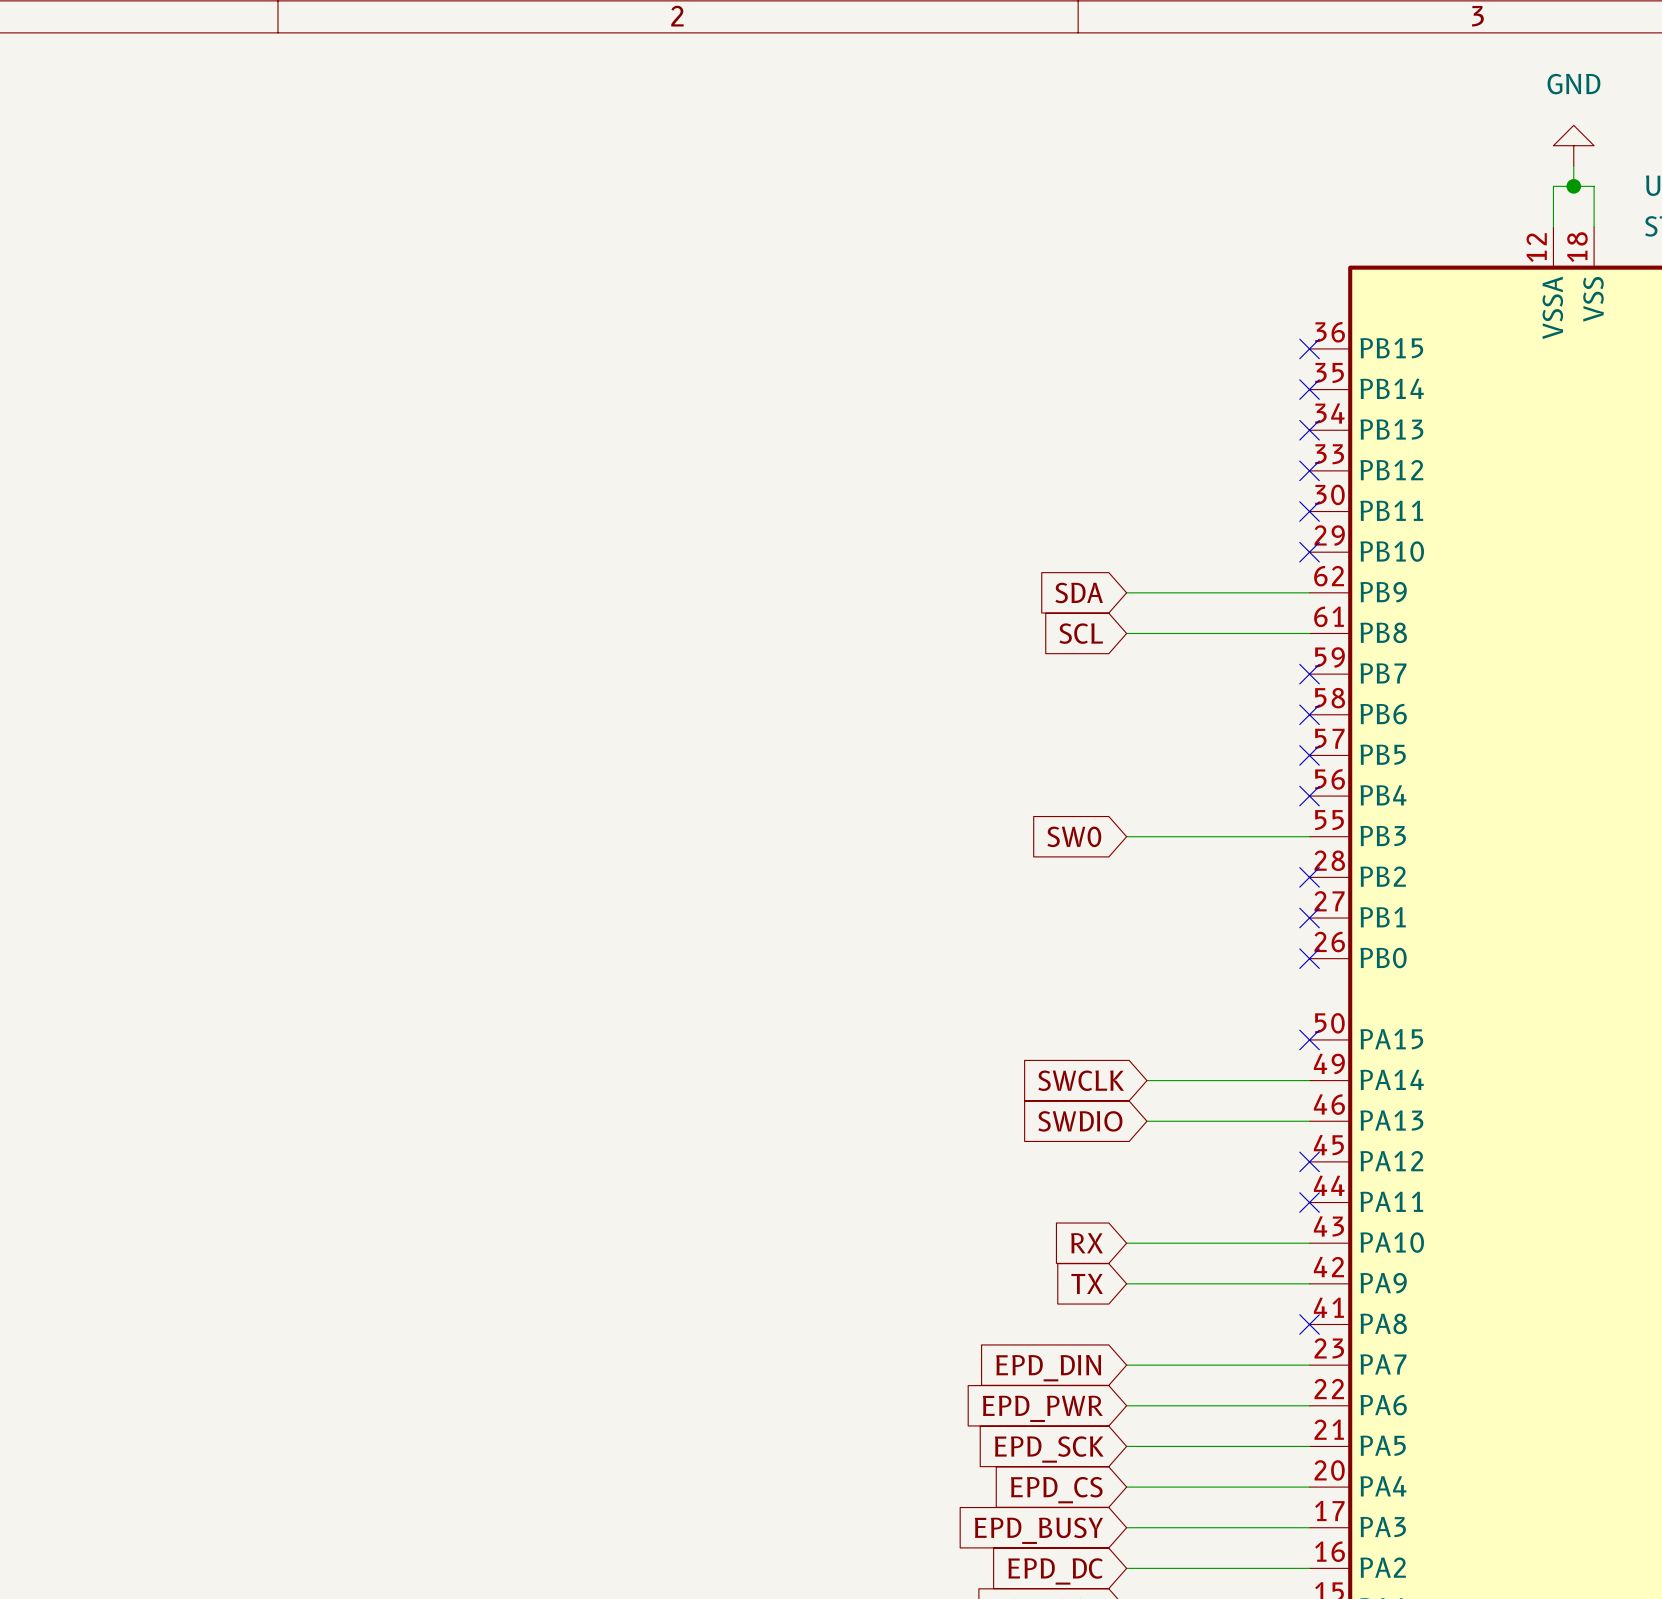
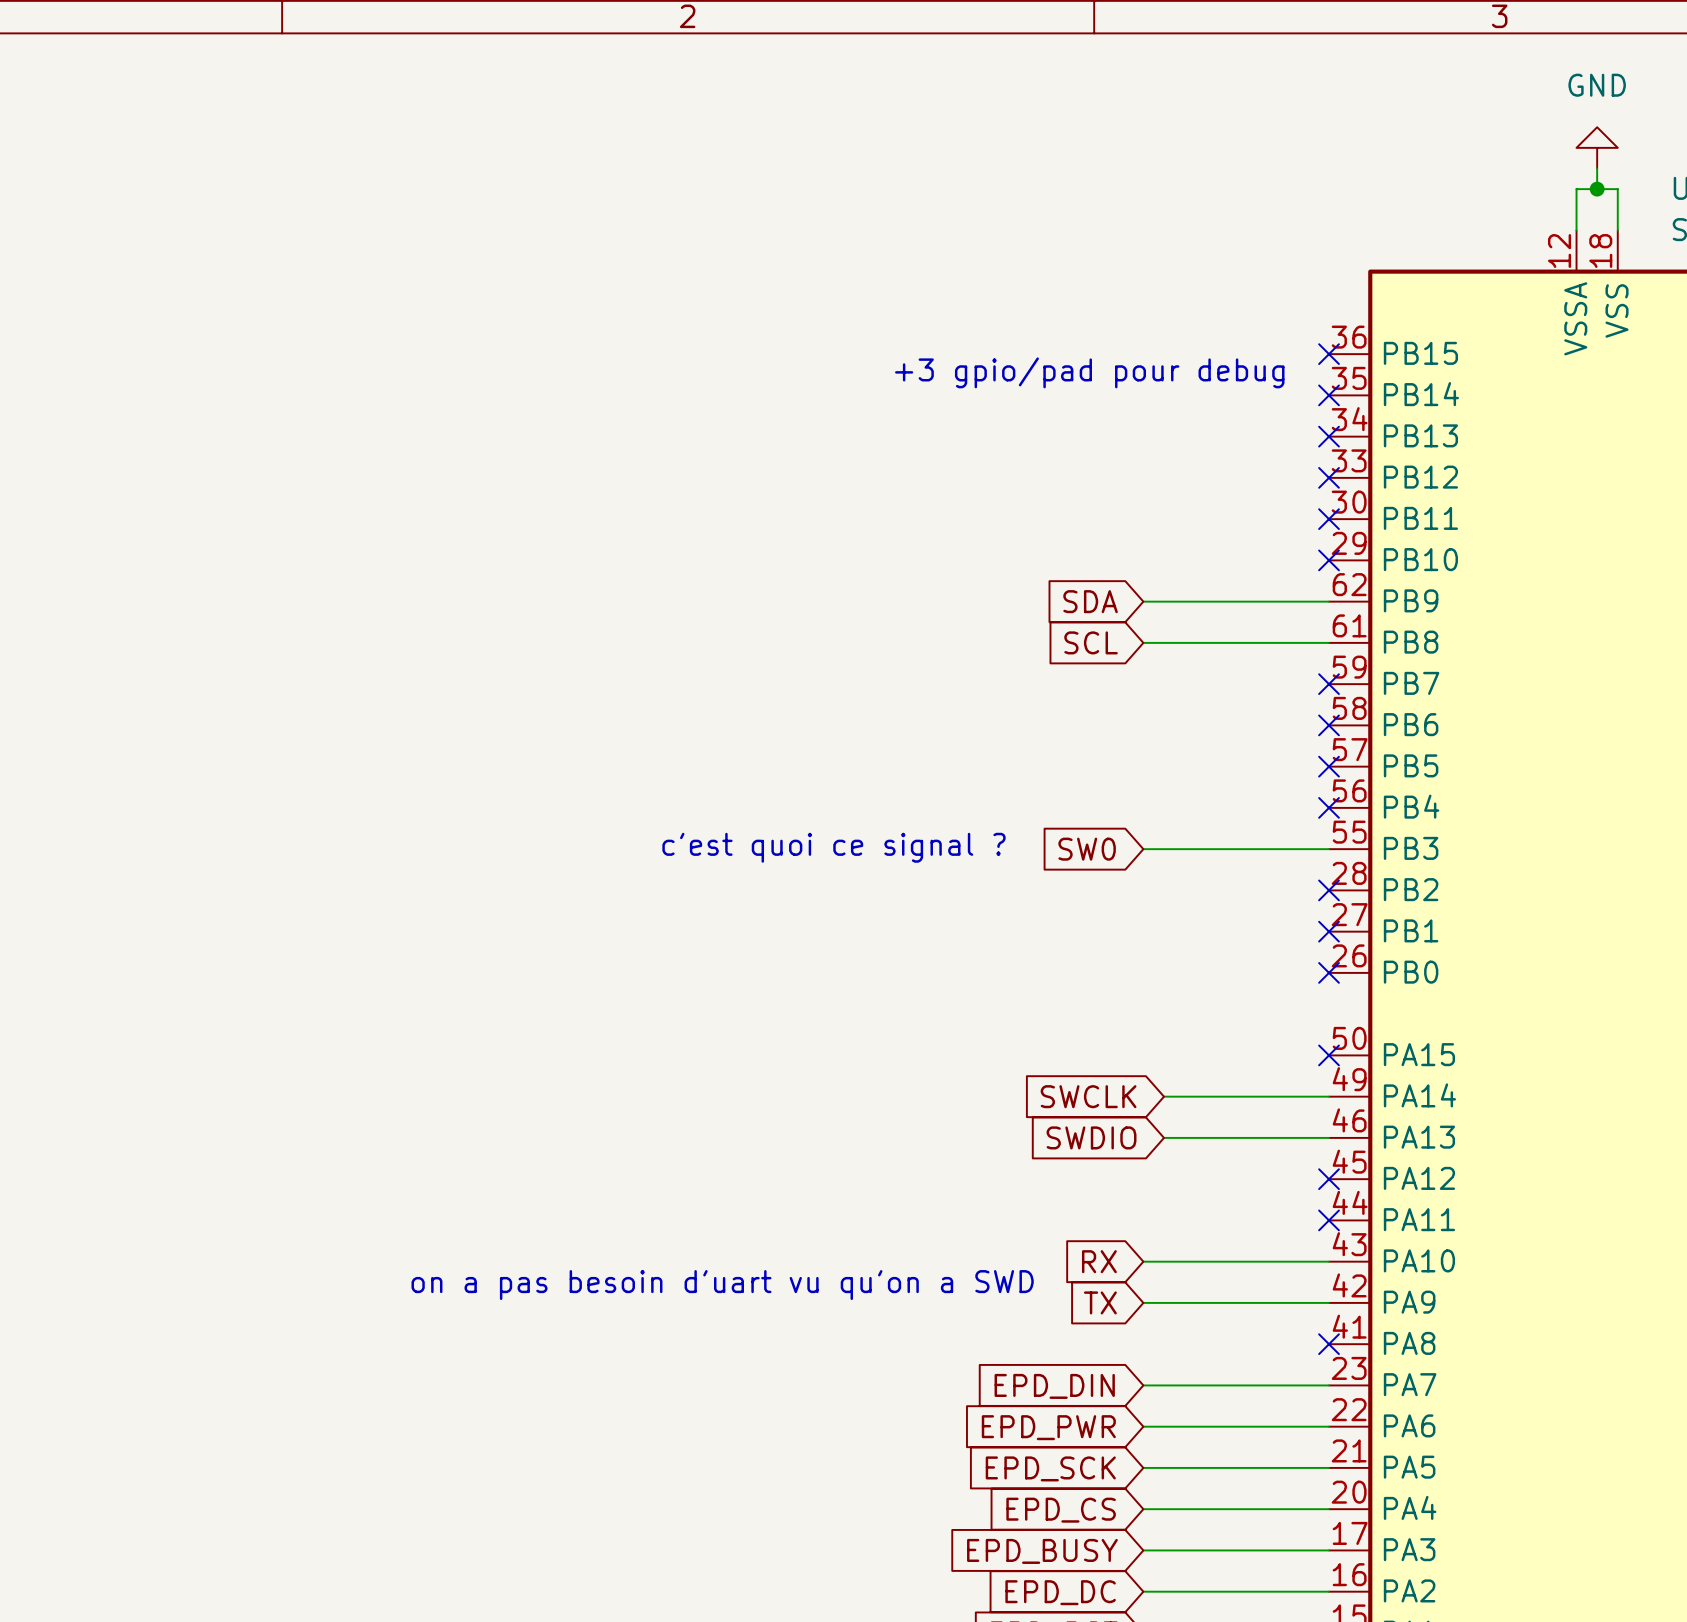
text: none -> +3 gpio/pad pour debug (1089, 372)
text: none -> c'est quoi ce signal ? (833, 847)
text: none -> on a pas besoin d'uart vu qu'on a SWD (722, 1285)

